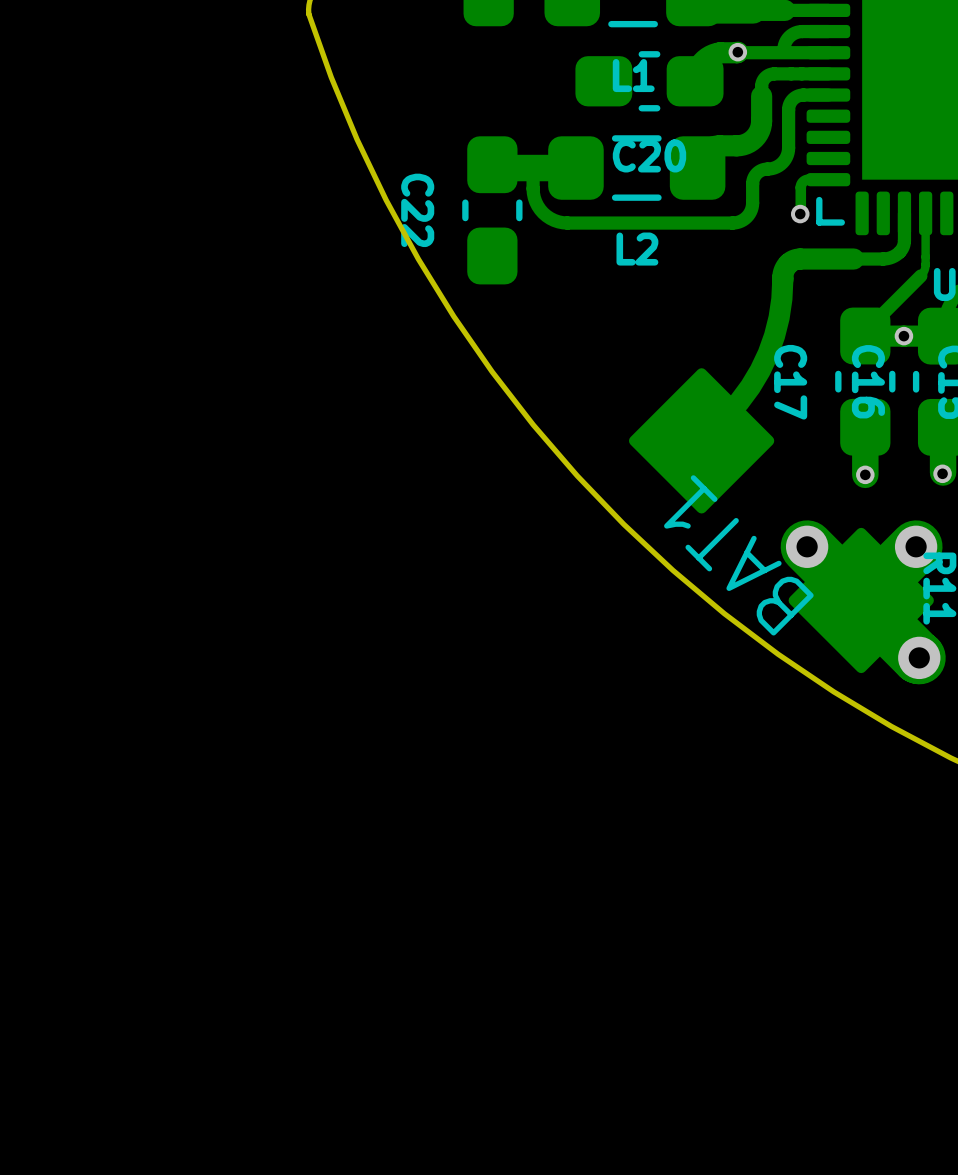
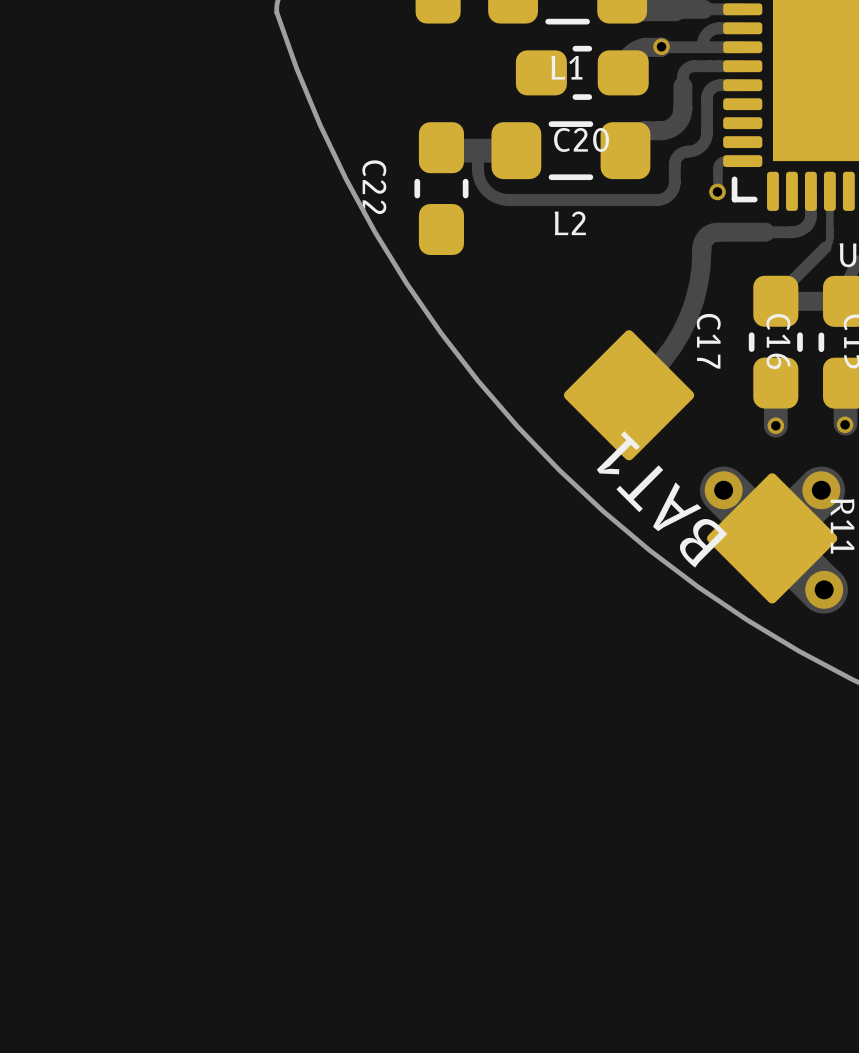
via: (903, 336) -> none

